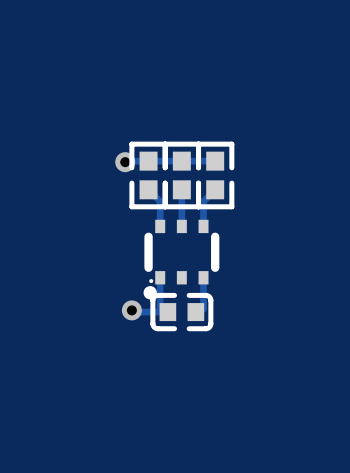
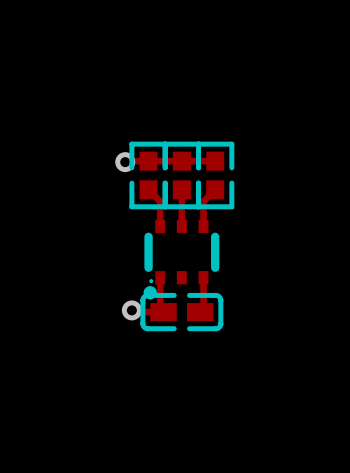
part footprint: [150, 292, 214, 332] -> [140, 292, 224, 332]

